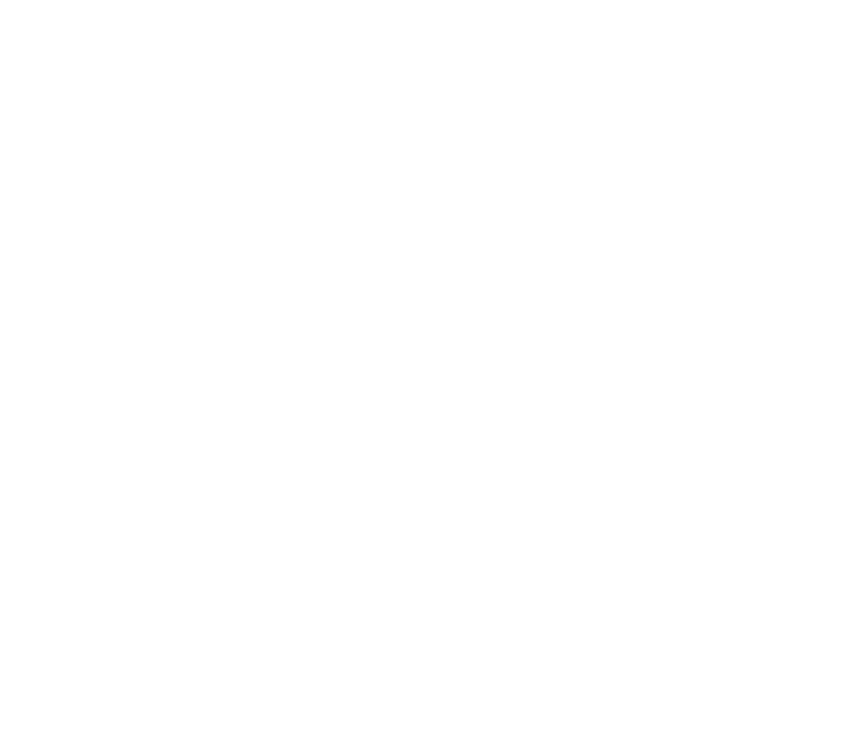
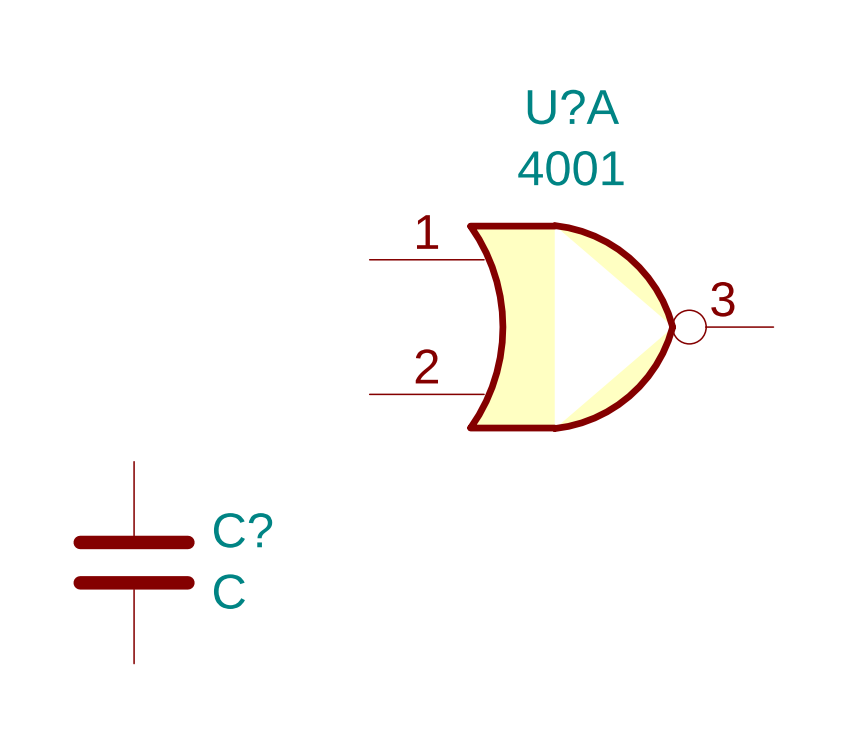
U?A: none -> 4001 (571, 327)
C?: none -> C (134, 562)

